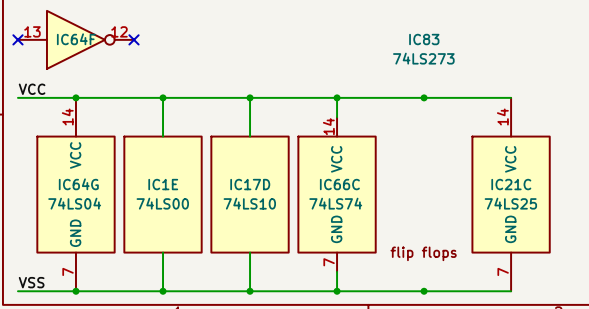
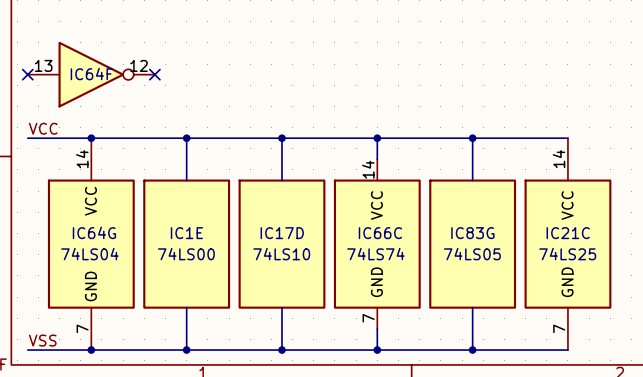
wire: none -> (472, 138) (472, 180)
IC83: 74LS273 (423, 147) -> none
IC83G: none -> 74LS05 (472, 244)
wire: none -> (472, 307) (472, 350)

